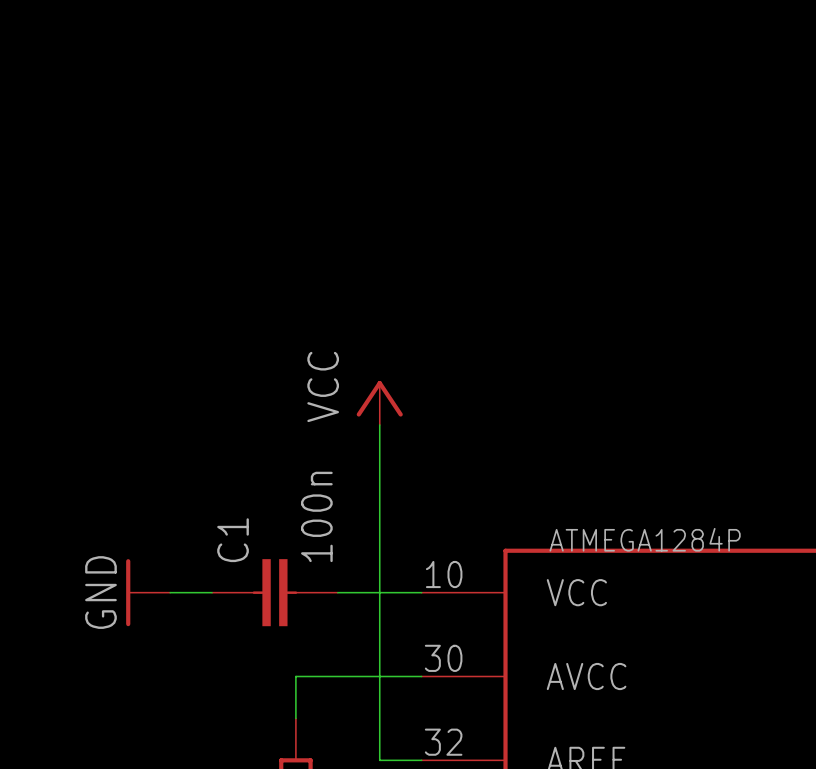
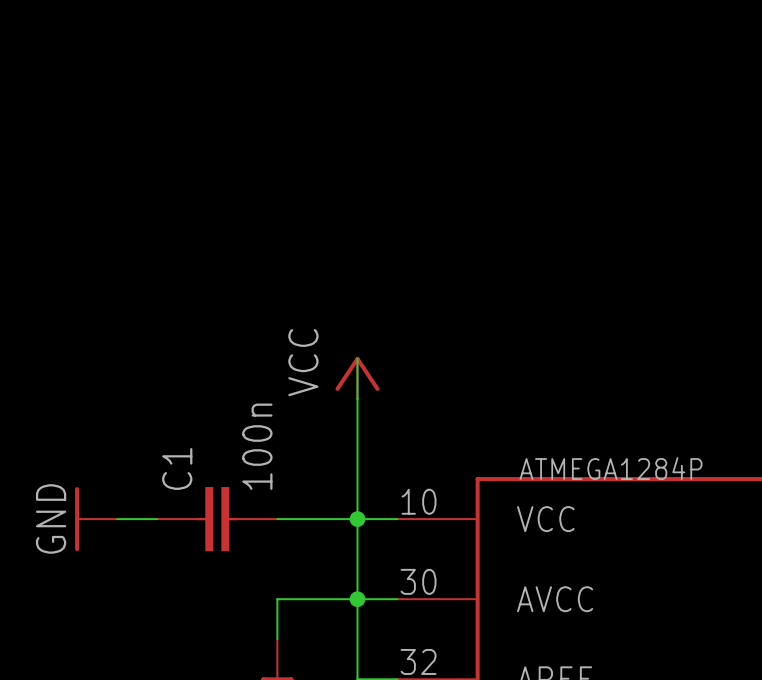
power symbol position: VCC (379, 402) -> VCC (357, 377)
power symbol position: GND (148, 592) -> GND (96, 519)
C1 position: (274, 592) -> (217, 519)
junction: none -> (357, 519)
junction: none -> (357, 599)

